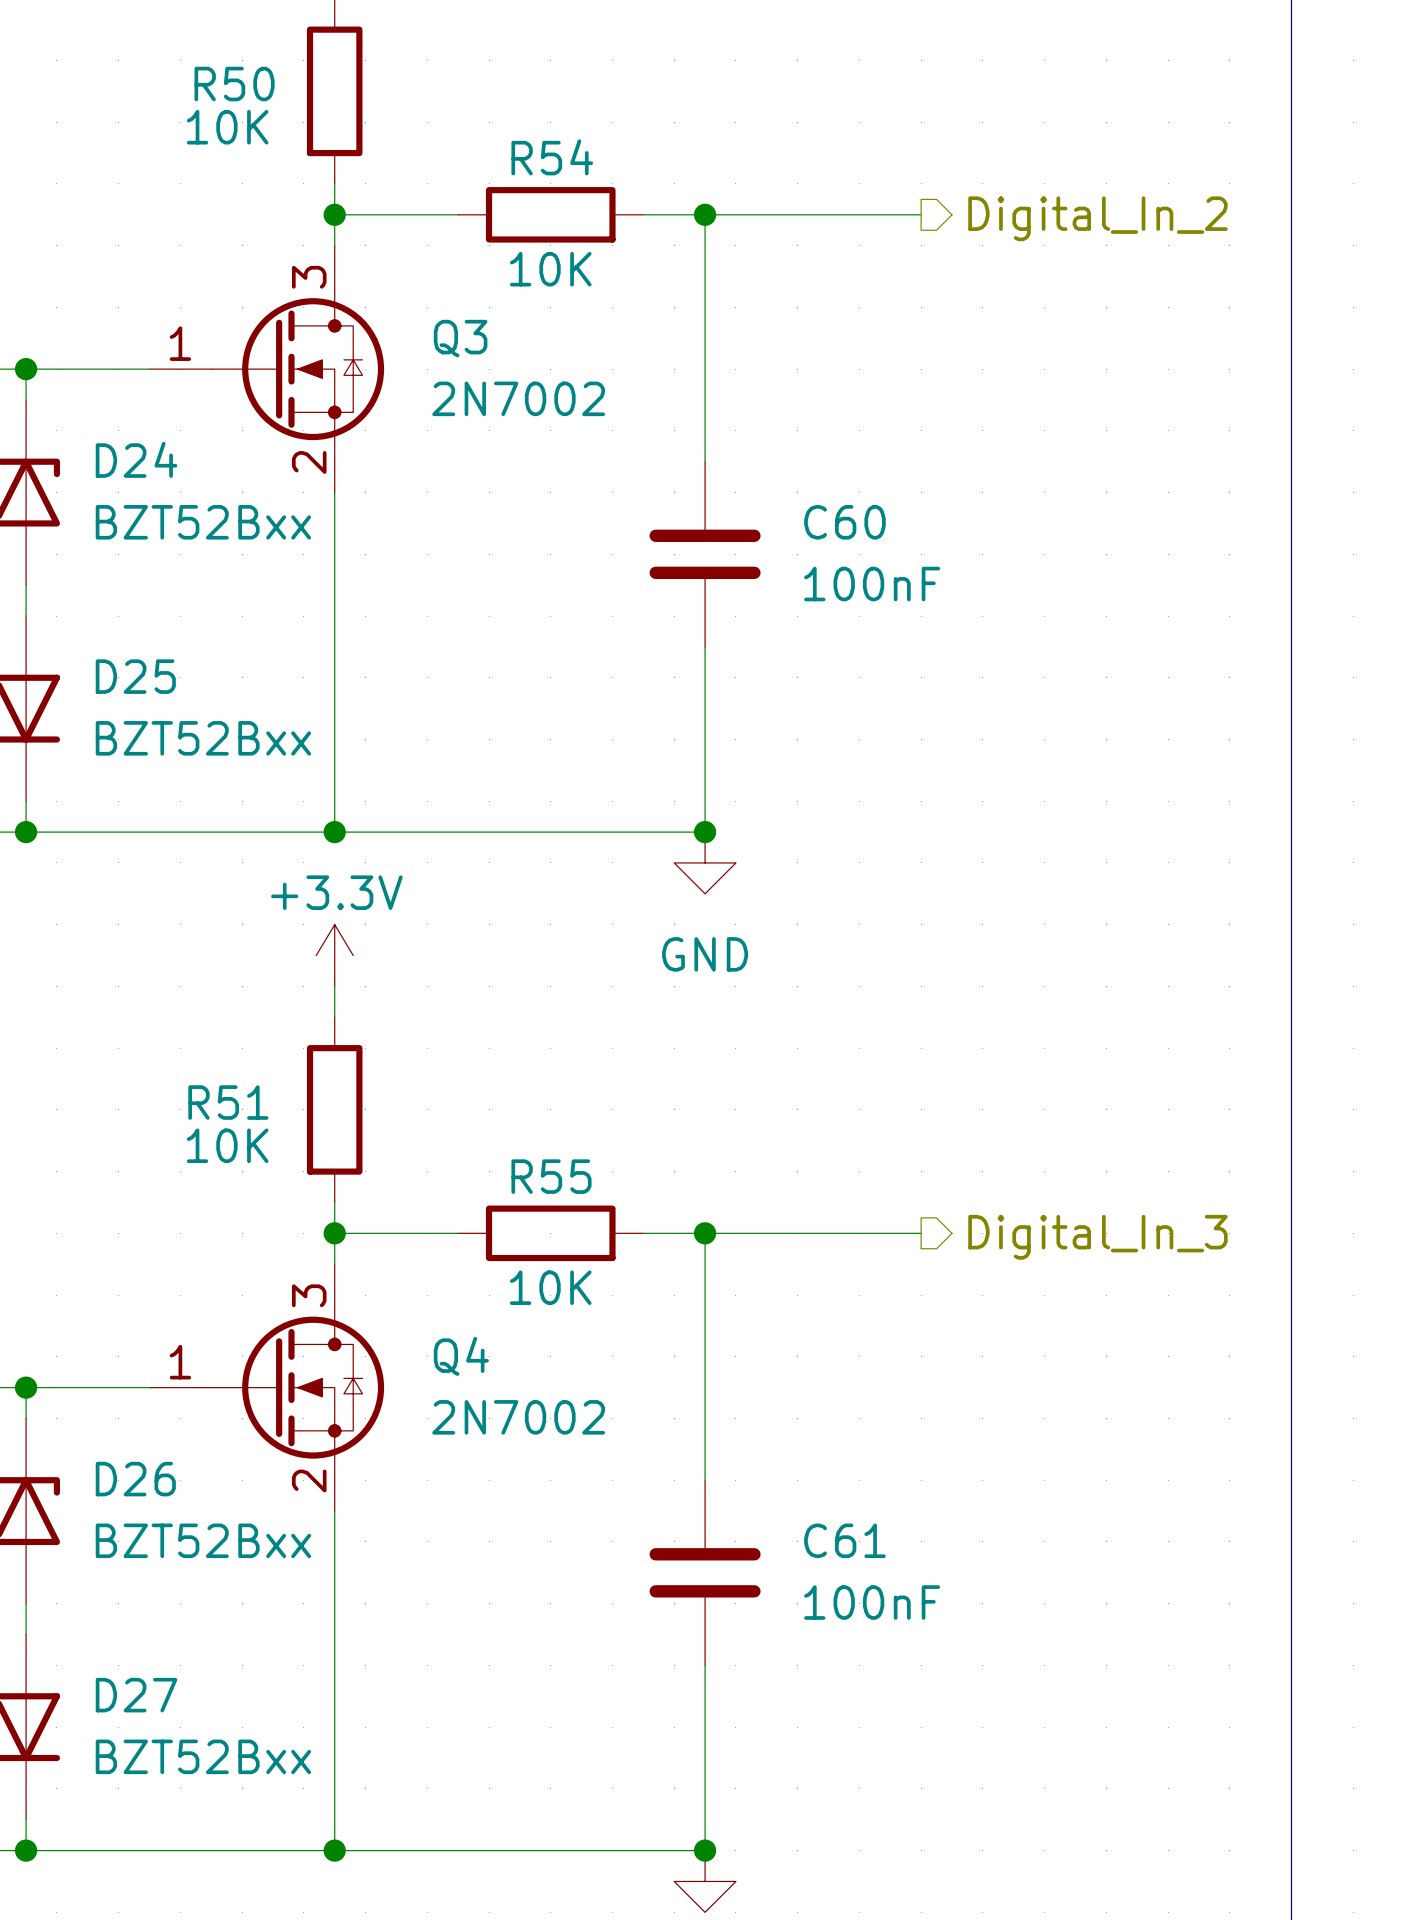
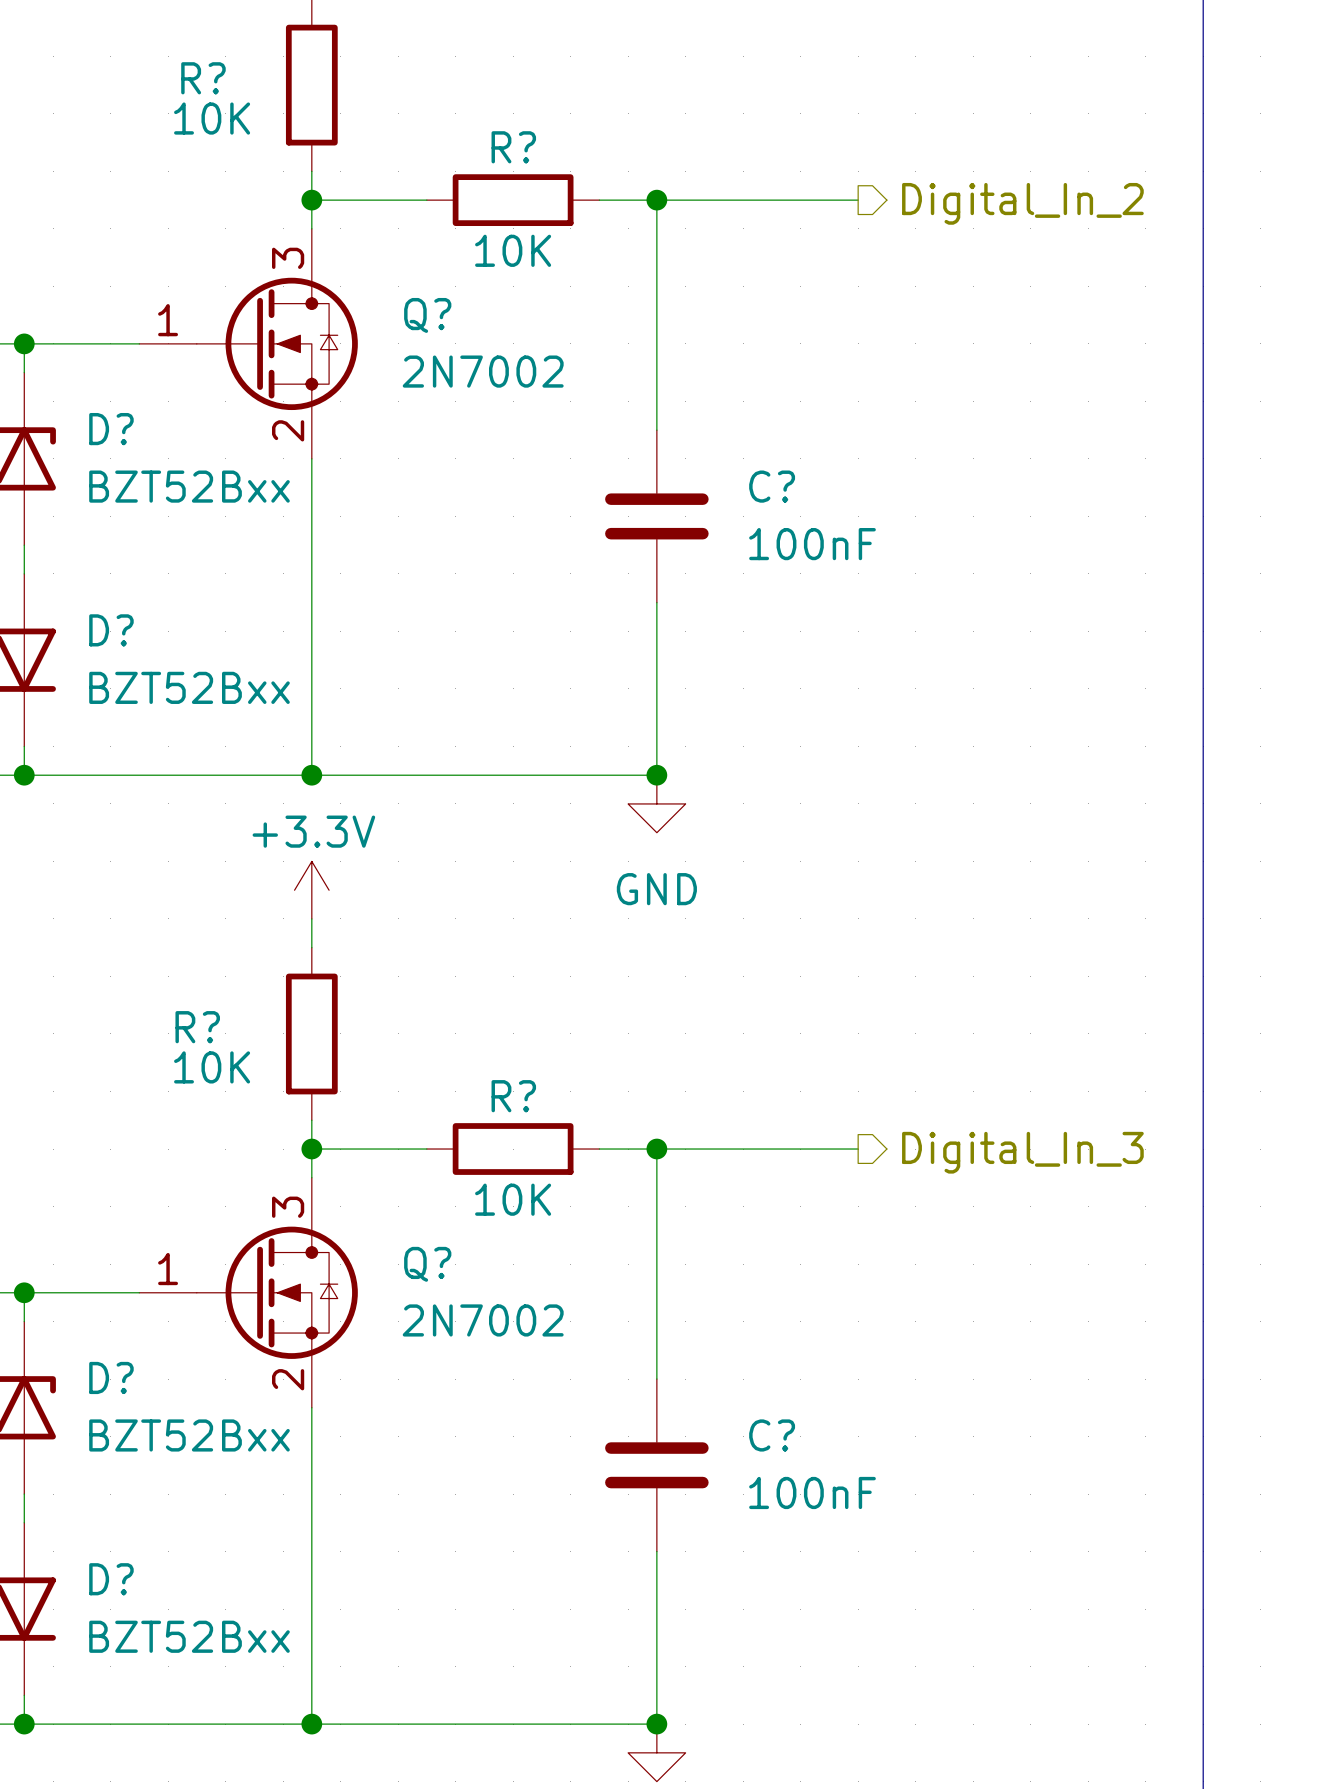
R50 name: R50 (234, 84) -> R? (203, 78)
R54 name: R54 (552, 157) -> R? (513, 147)
Q3 name: Q3 (460, 338) -> Q? (427, 315)
D24 name: D24 (136, 459) -> D? (111, 429)
C60 name: C60 (844, 522) -> C? (772, 486)
D25 name: D25 (135, 676) -> D? (111, 630)
R51 name: R51 (228, 1102) -> R? (197, 1027)
R55 name: R55 (551, 1176) -> R? (513, 1096)
Q4 name: Q4 (461, 1356) -> Q? (427, 1264)
D26 name: D26 (135, 1479) -> D? (111, 1377)
C61 name: C61 (844, 1540) -> C? (772, 1435)
D27 name: D27 (136, 1695) -> D? (111, 1579)

